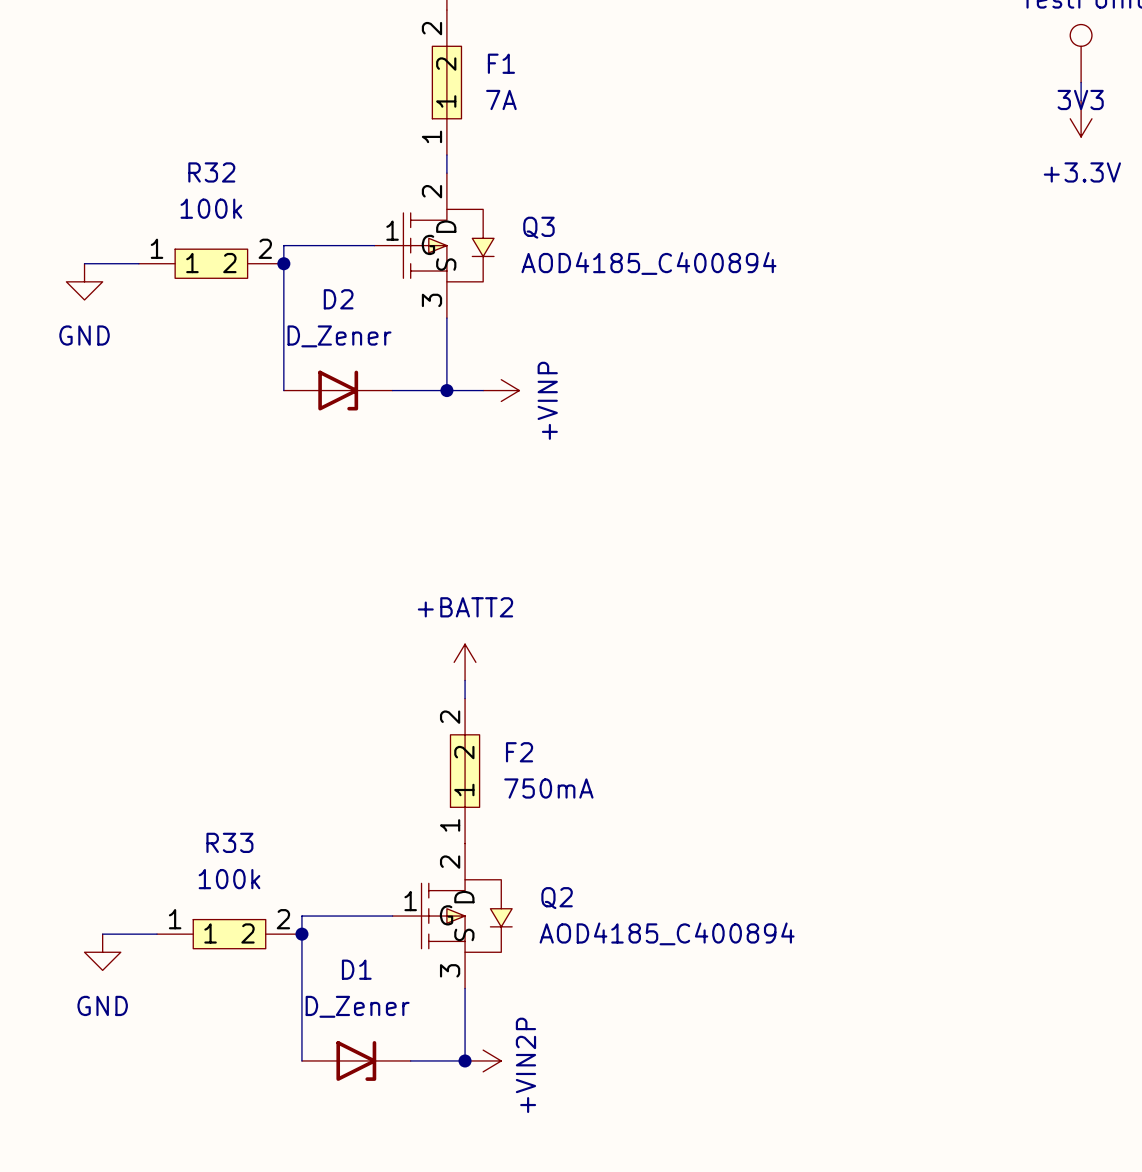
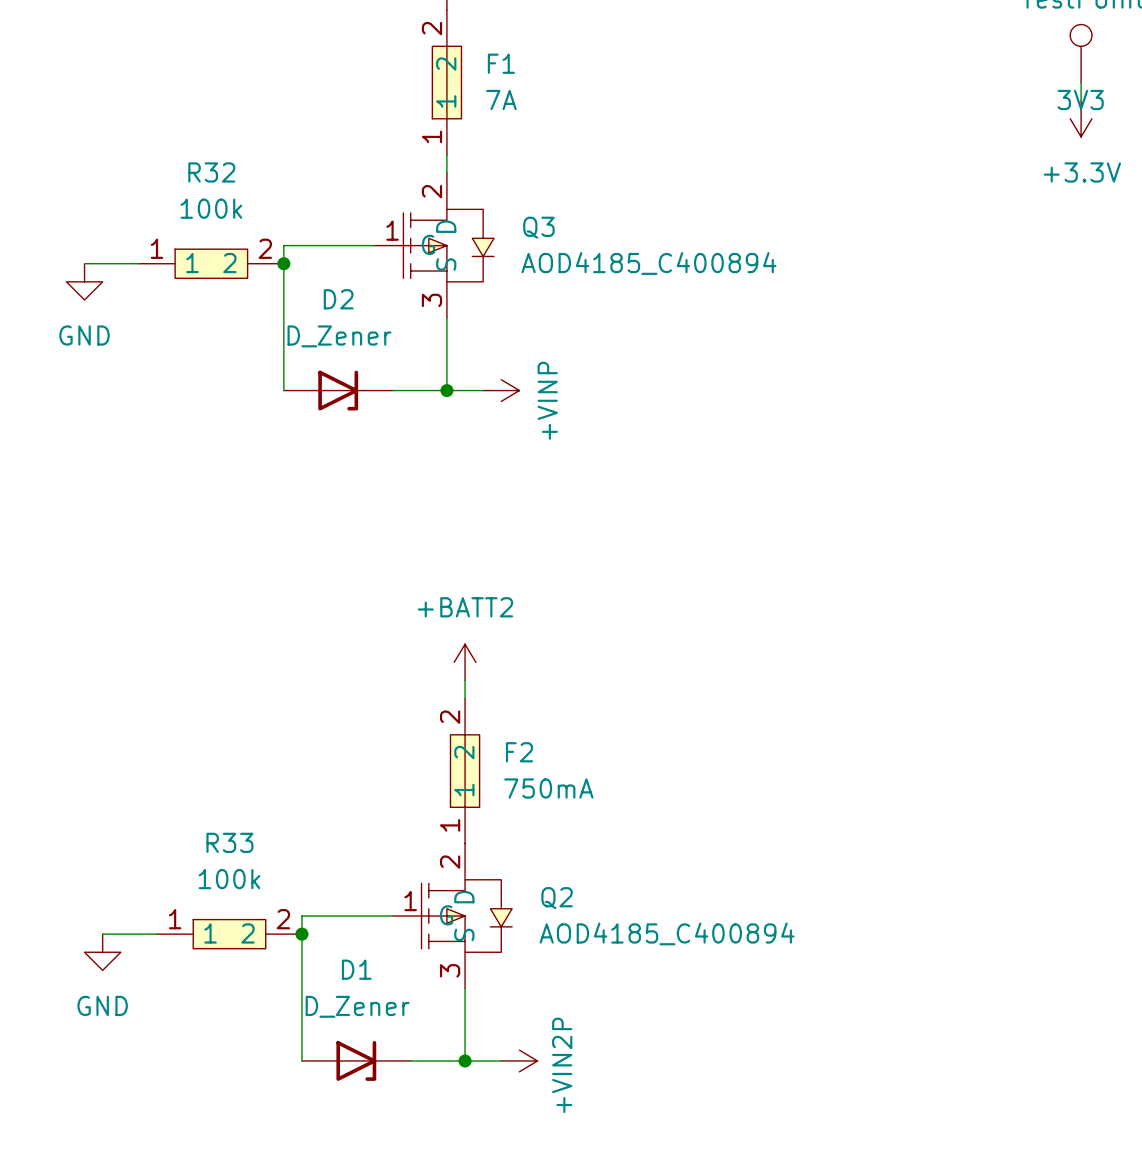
power symbol position: +VIN2P (483, 1060) -> +VIN2P (519, 1060)

